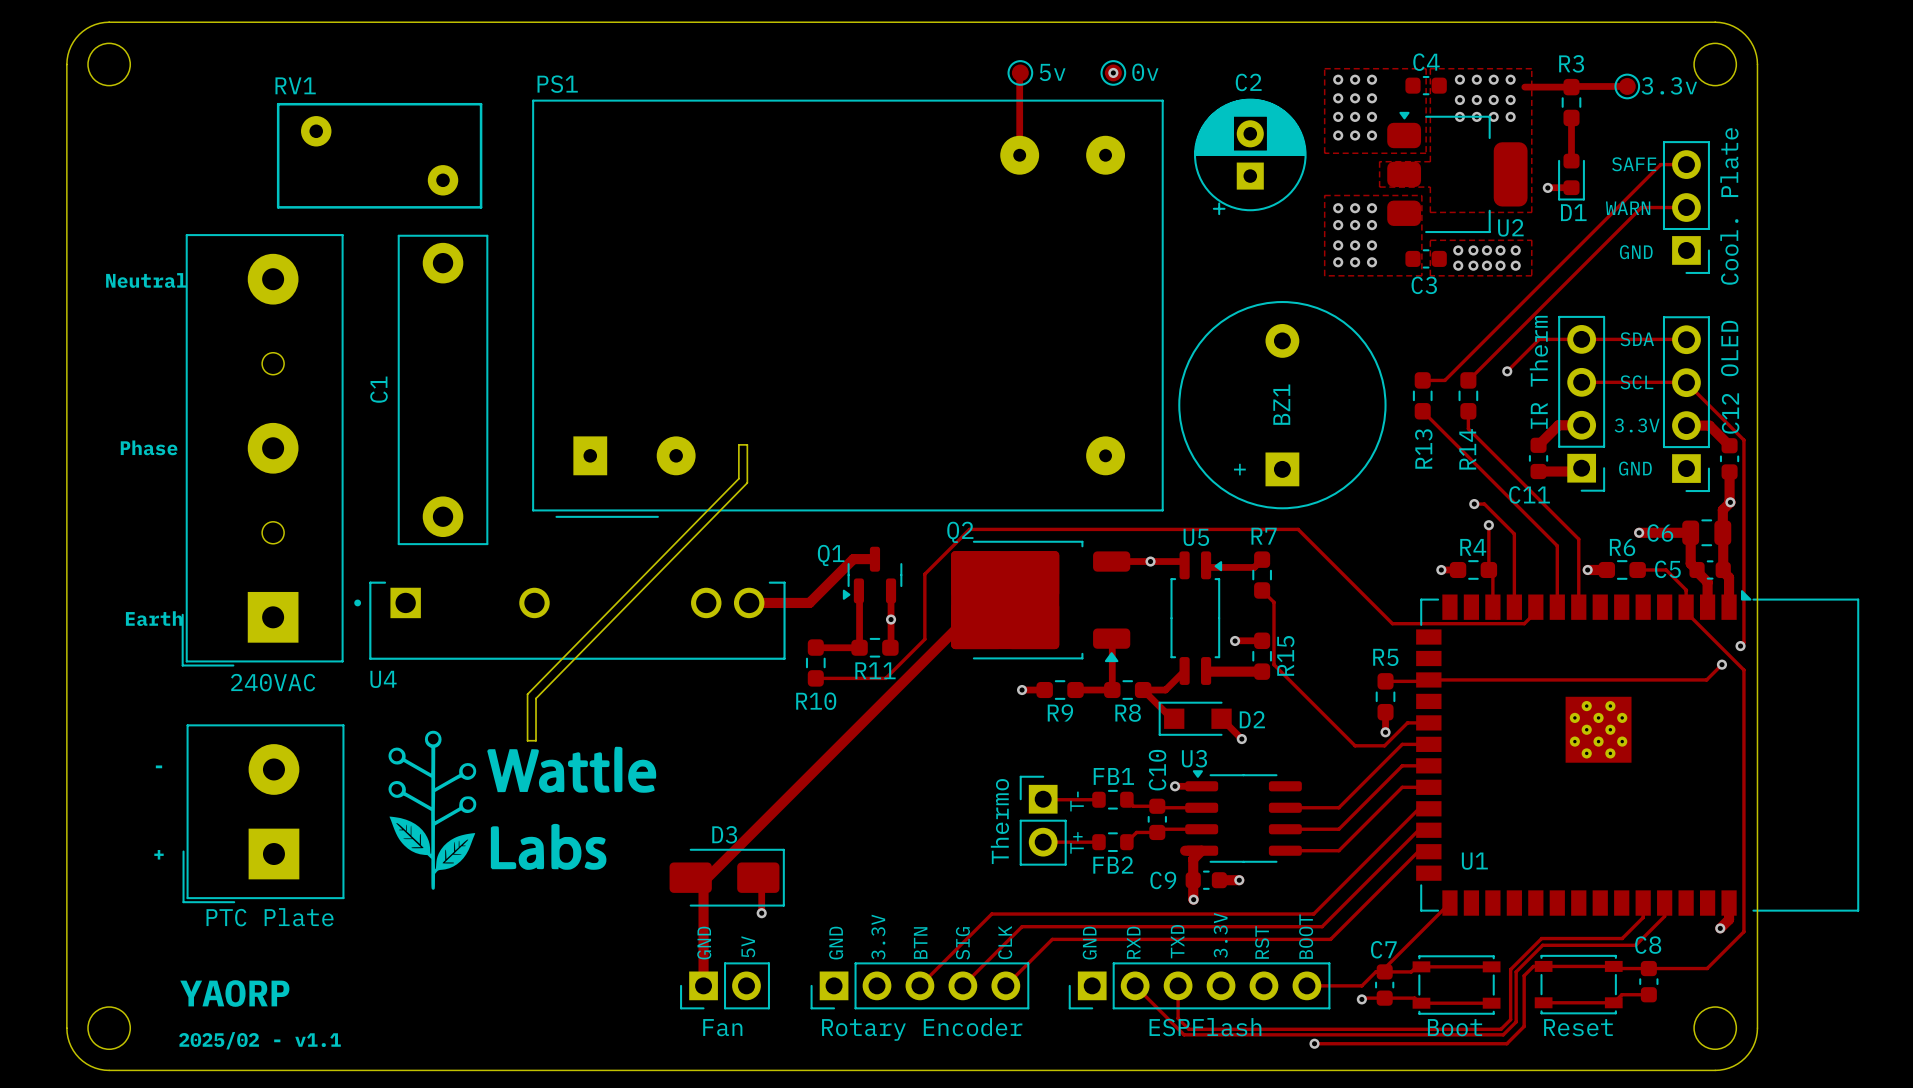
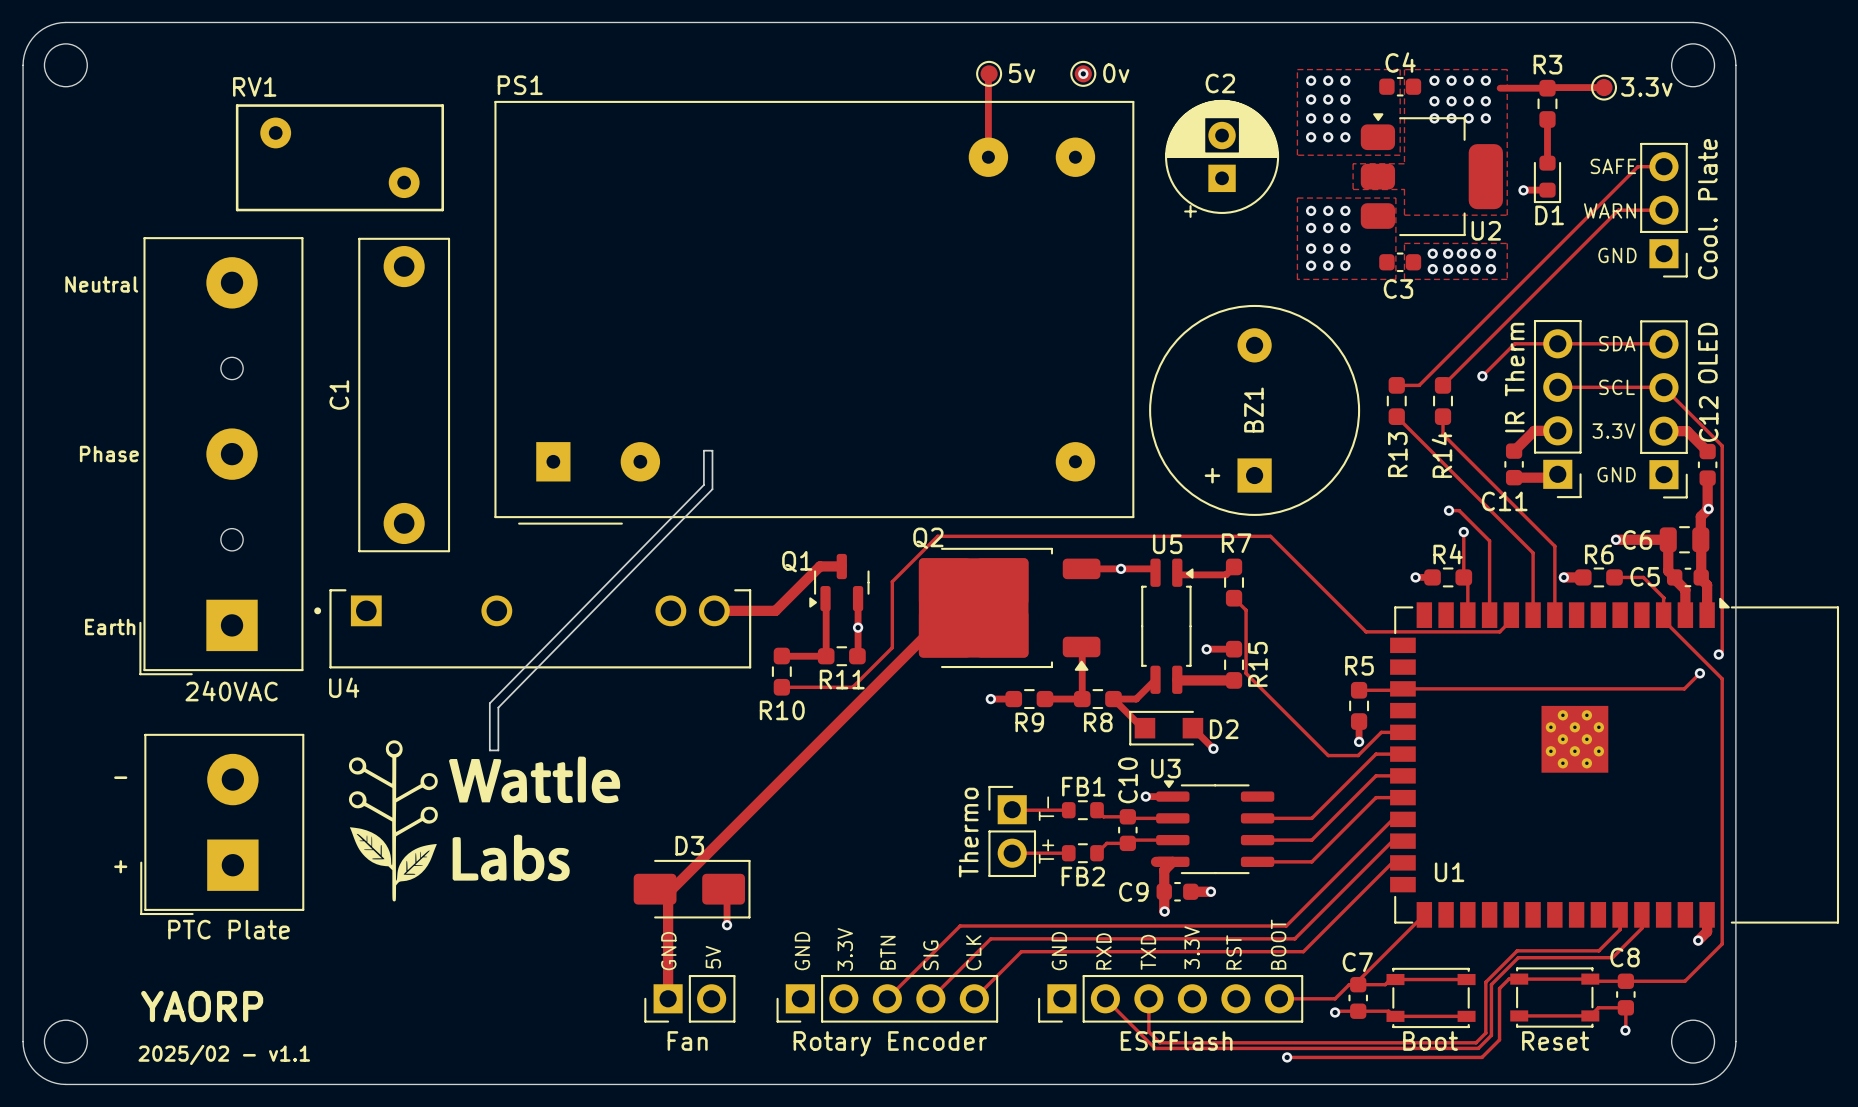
track: none -> (1625, 1007) (1625, 1030)
via: none -> (1625, 1030)

